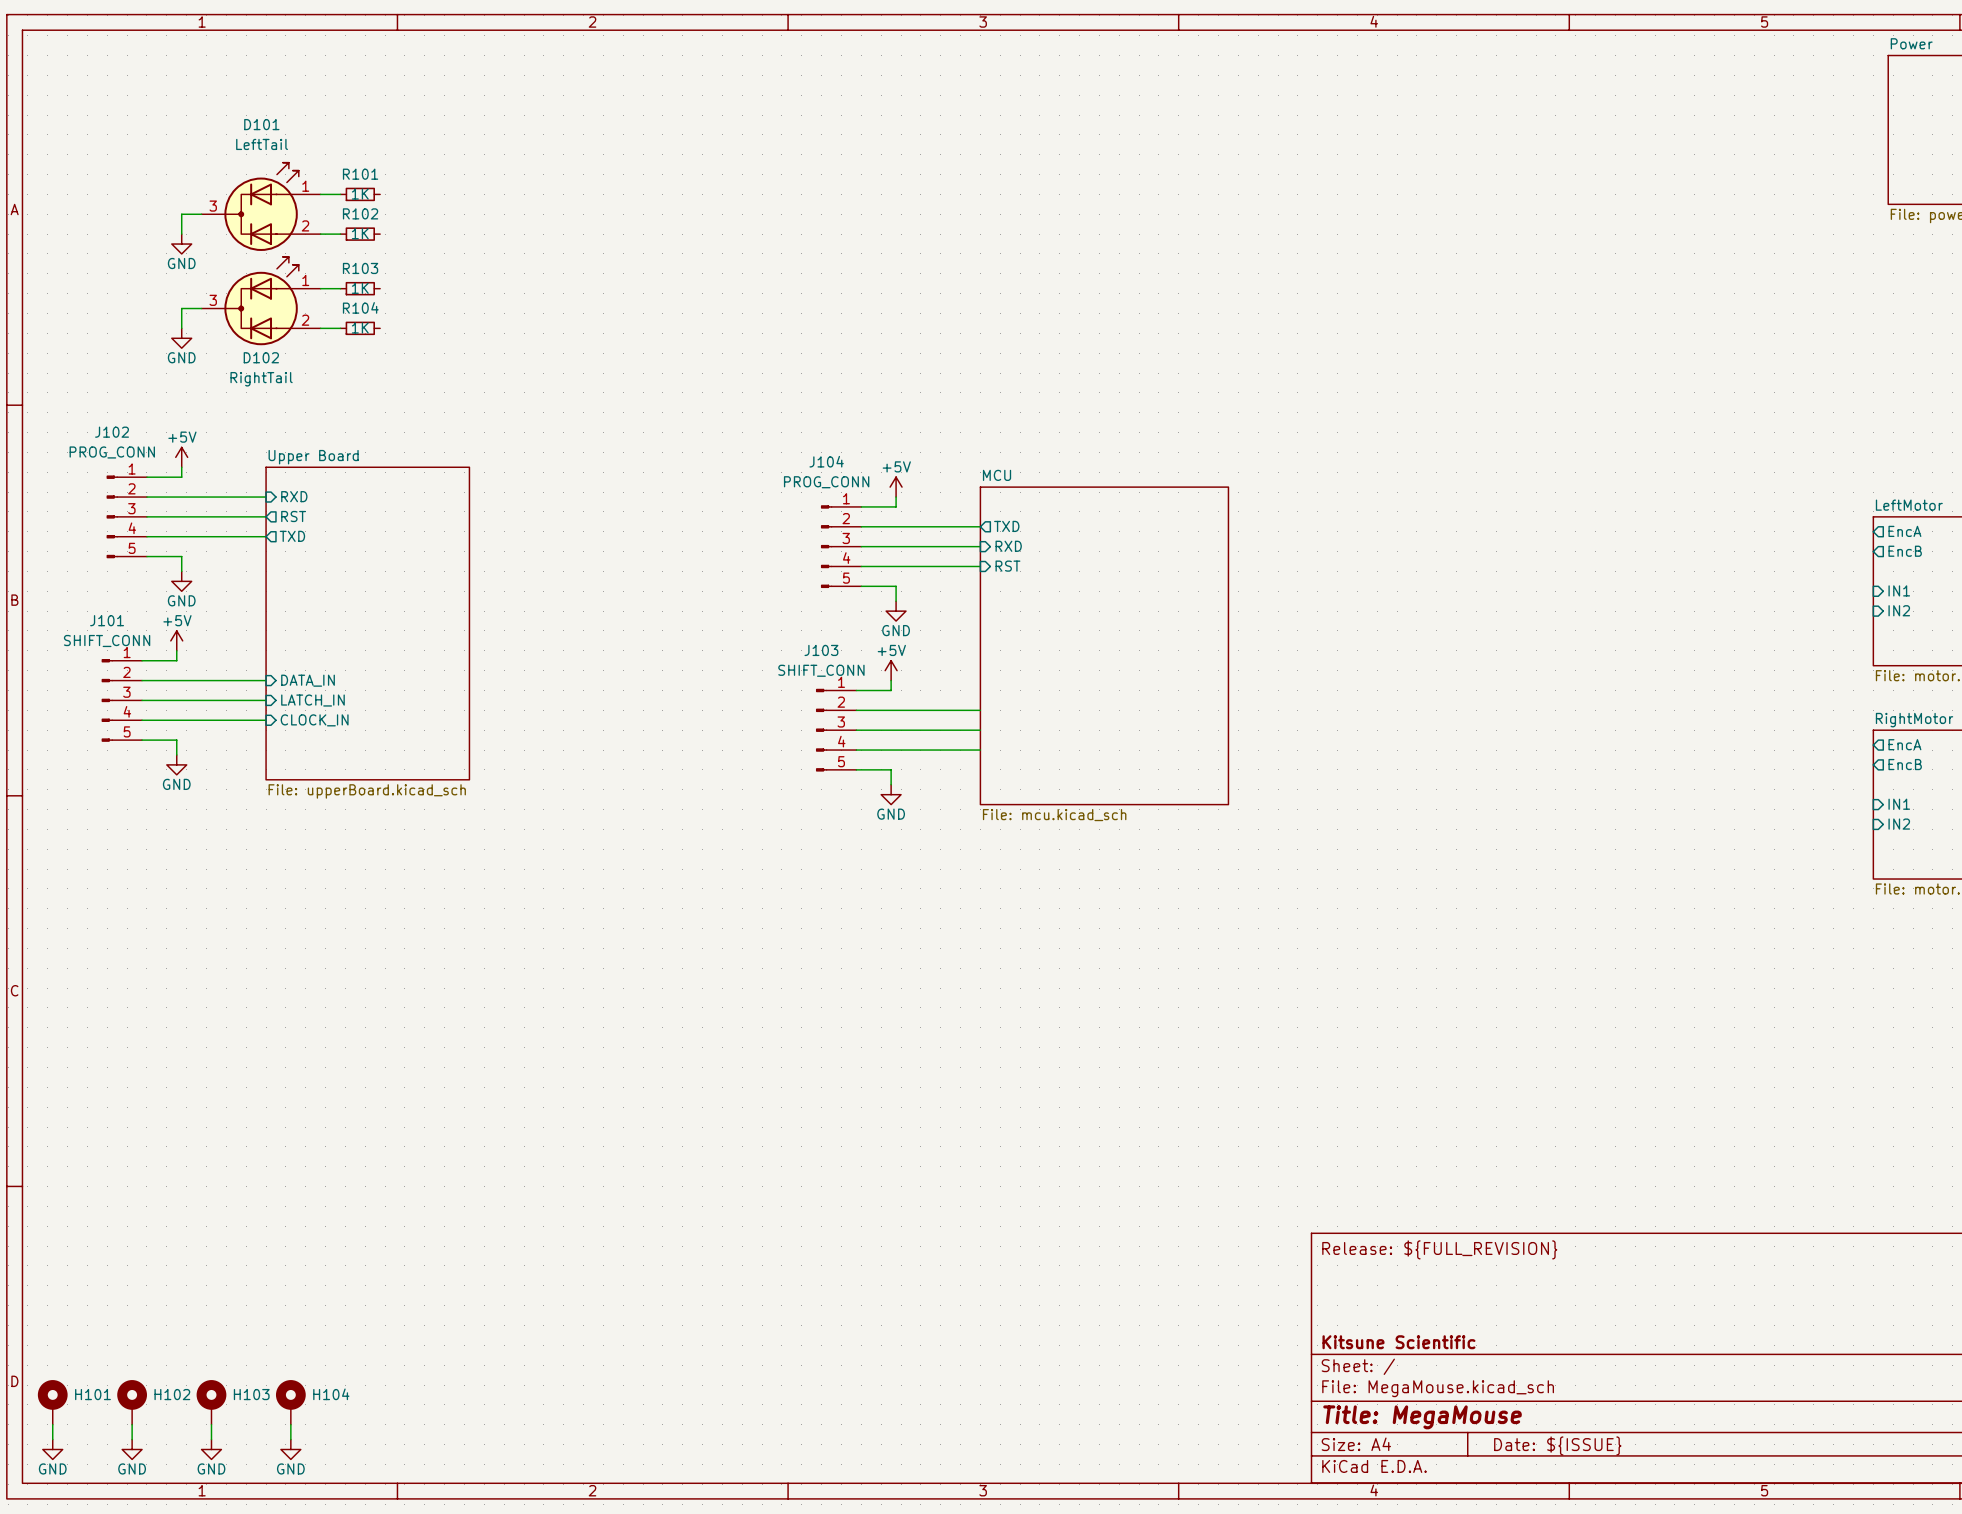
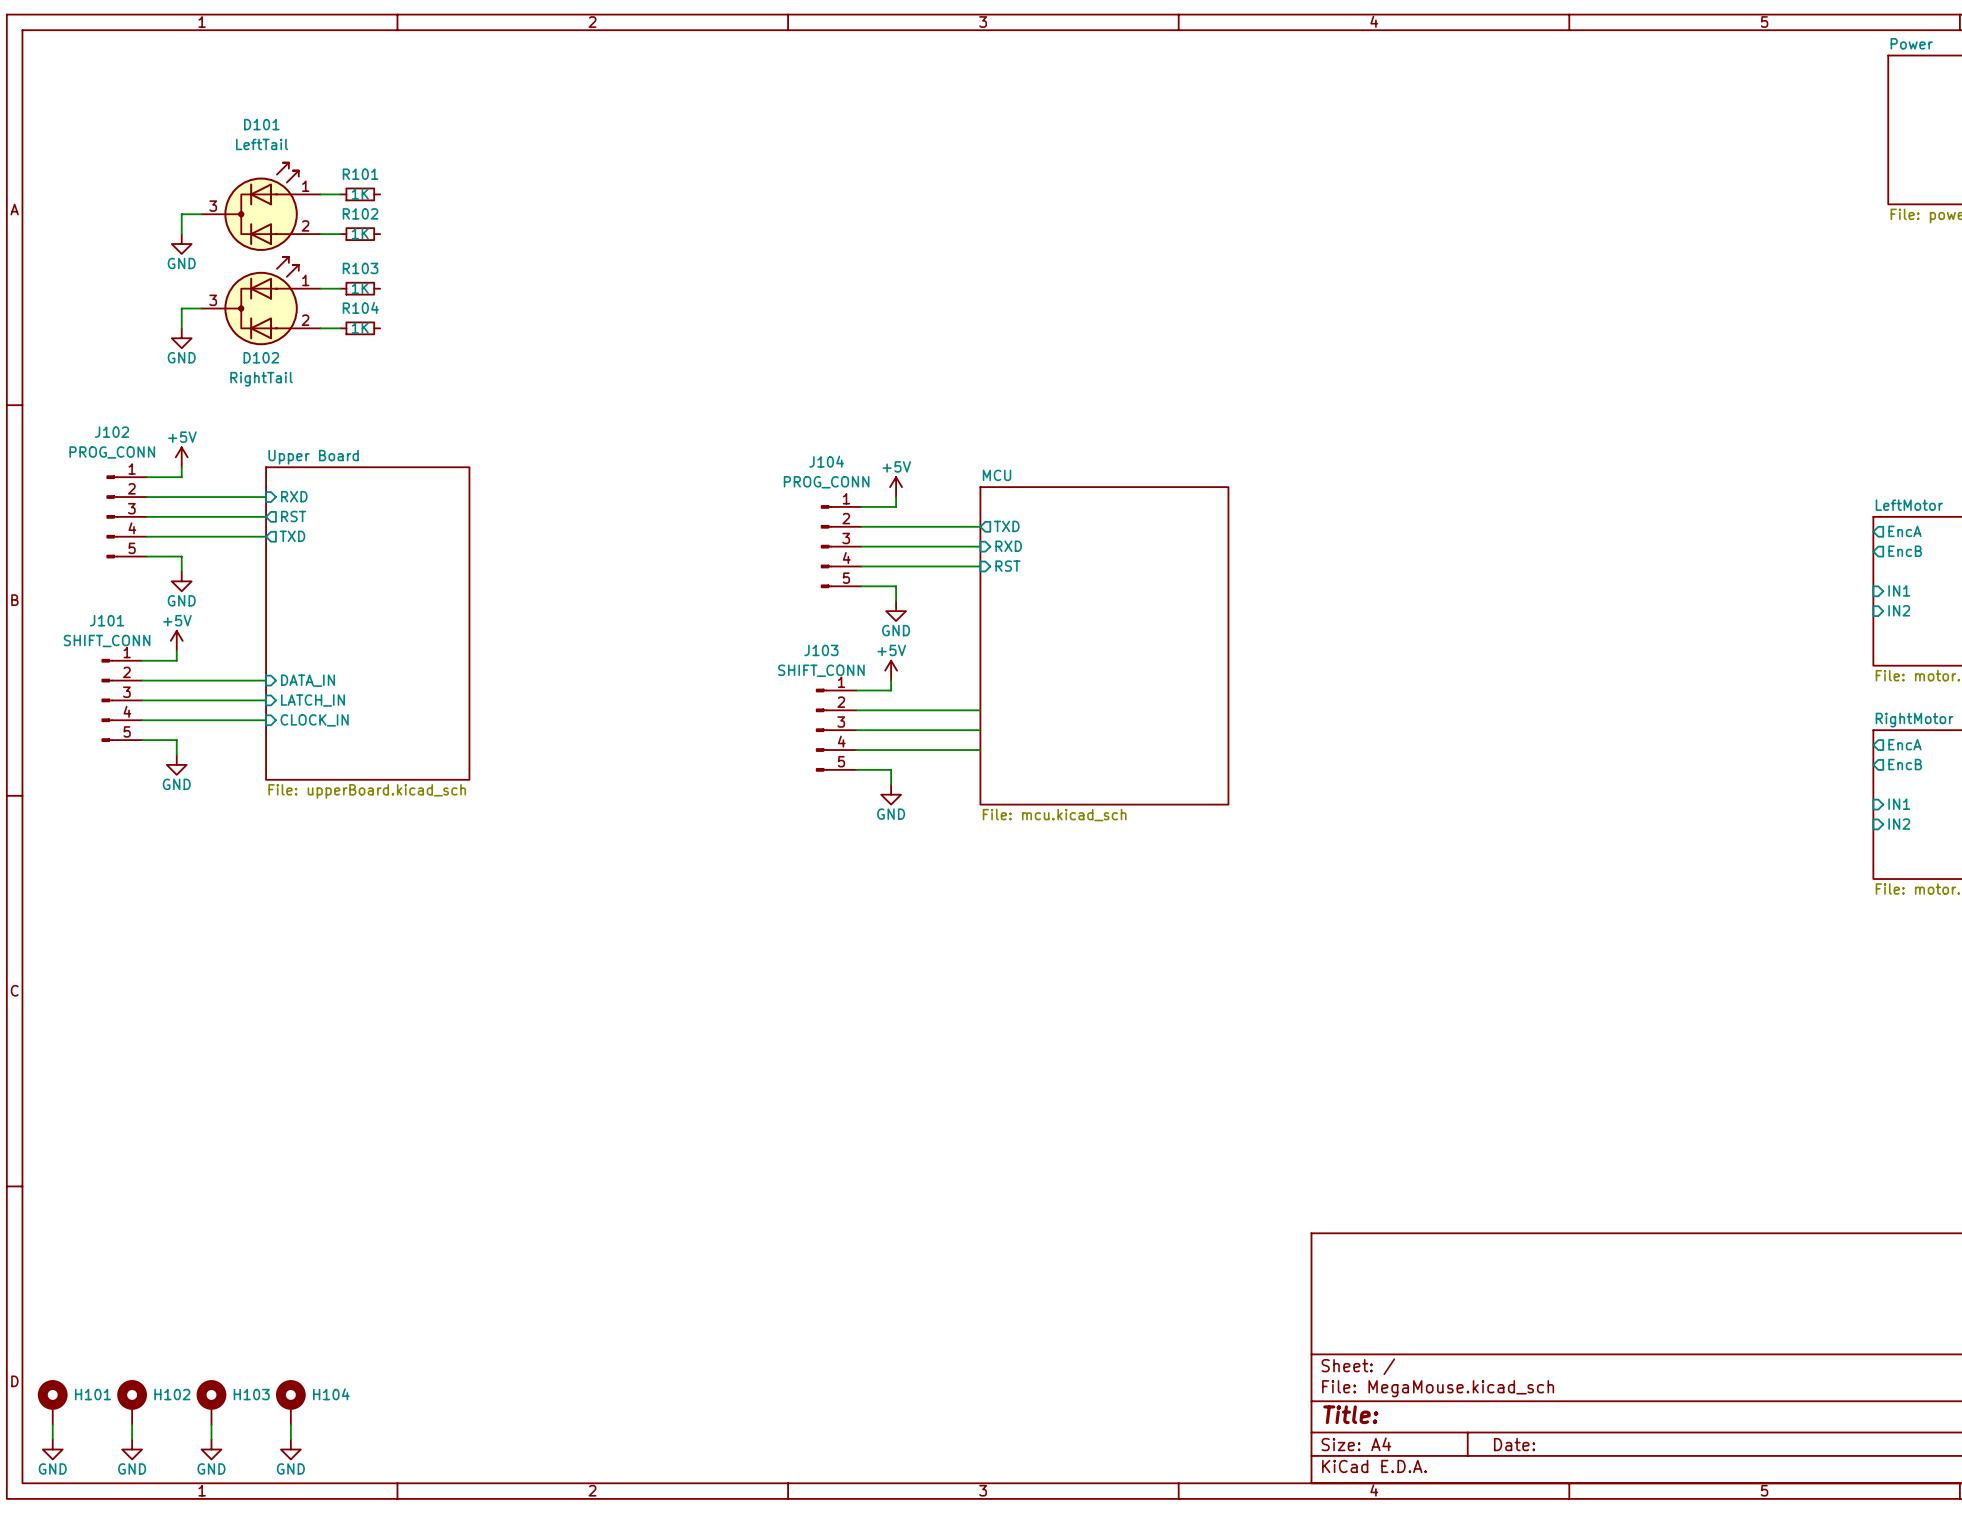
title block: Release: ${FULL_REVISION} (1439, 1249) -> none
title block: Kitsune Scientific (1398, 1342) -> none
title block: Title: MegaMouse (1422, 1417) -> Title: (1350, 1414)
title block: Date: ${ISSUE} (1557, 1445) -> Date: (1514, 1444)

